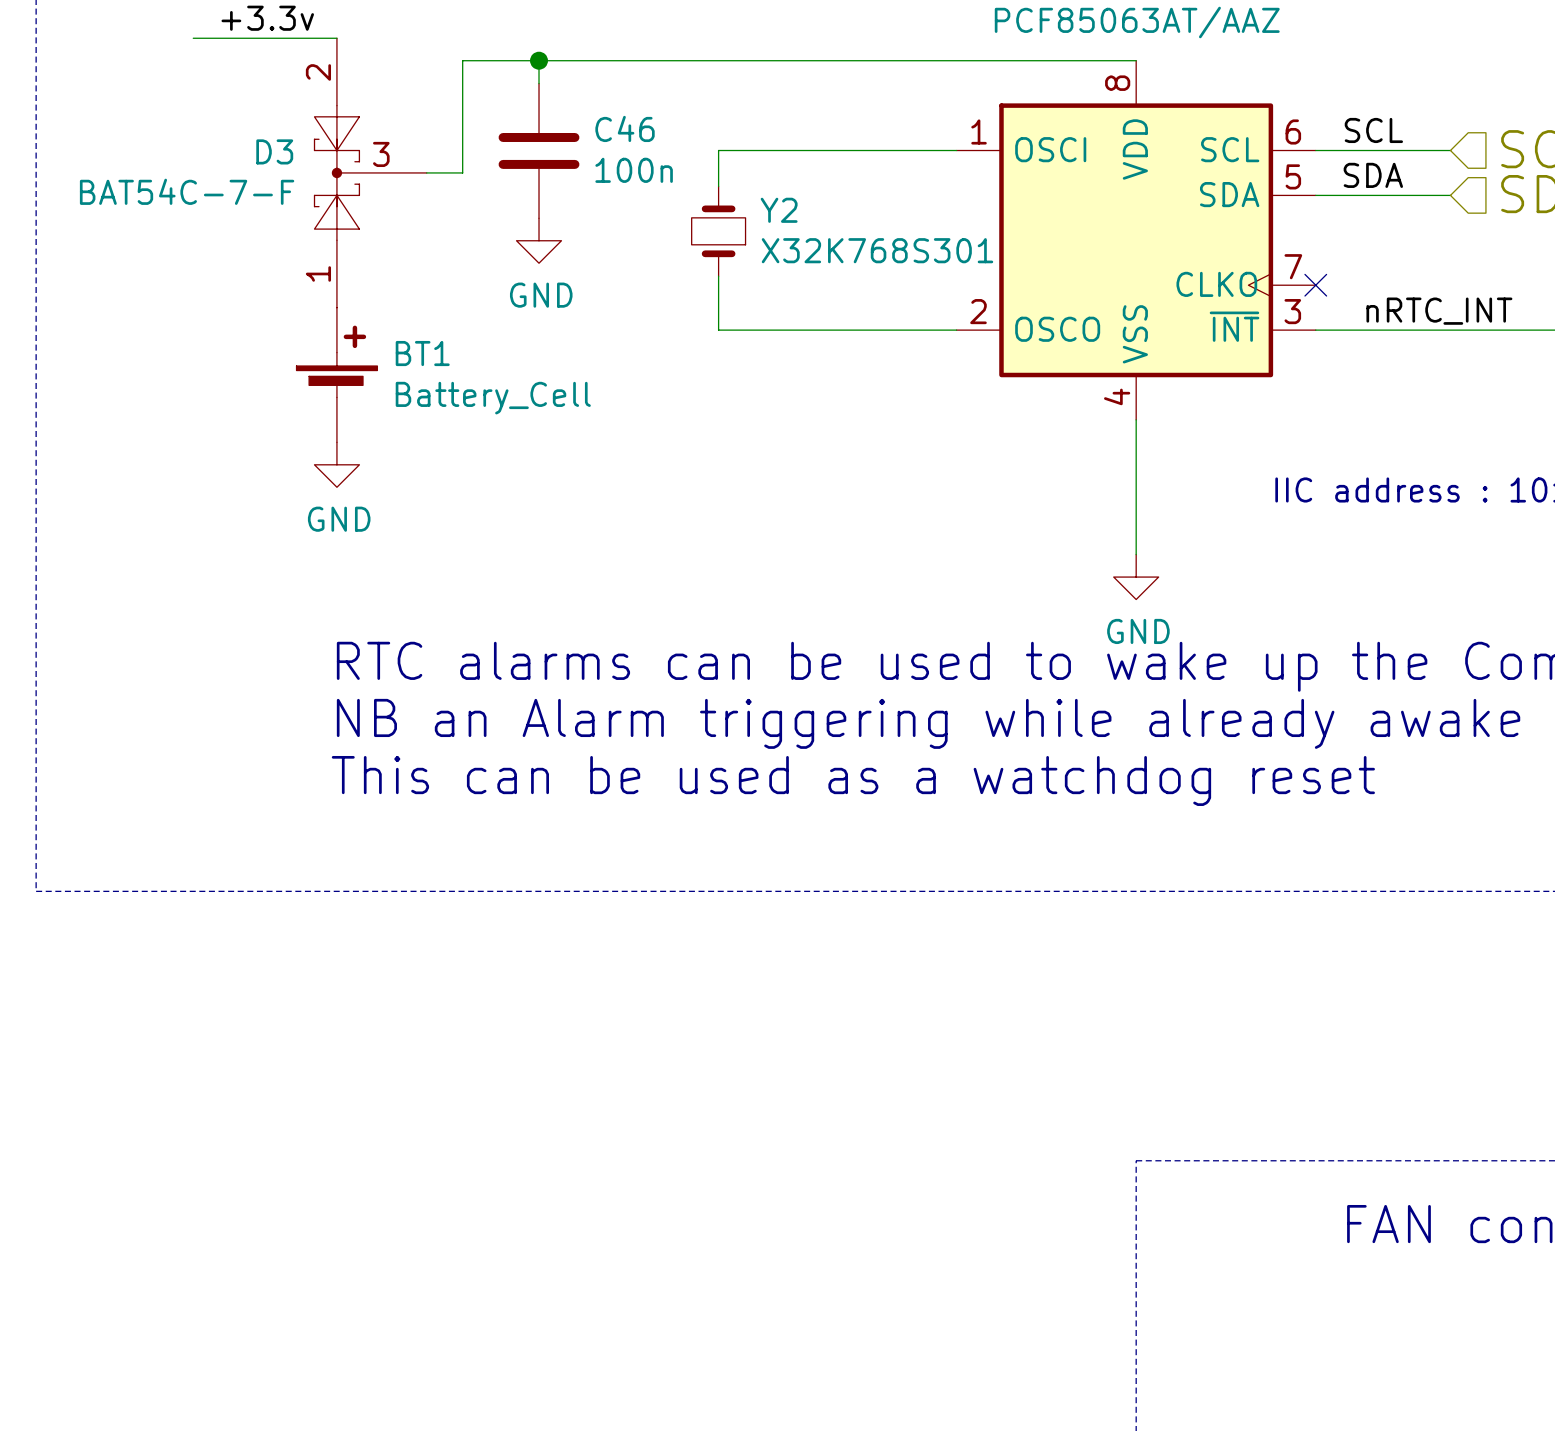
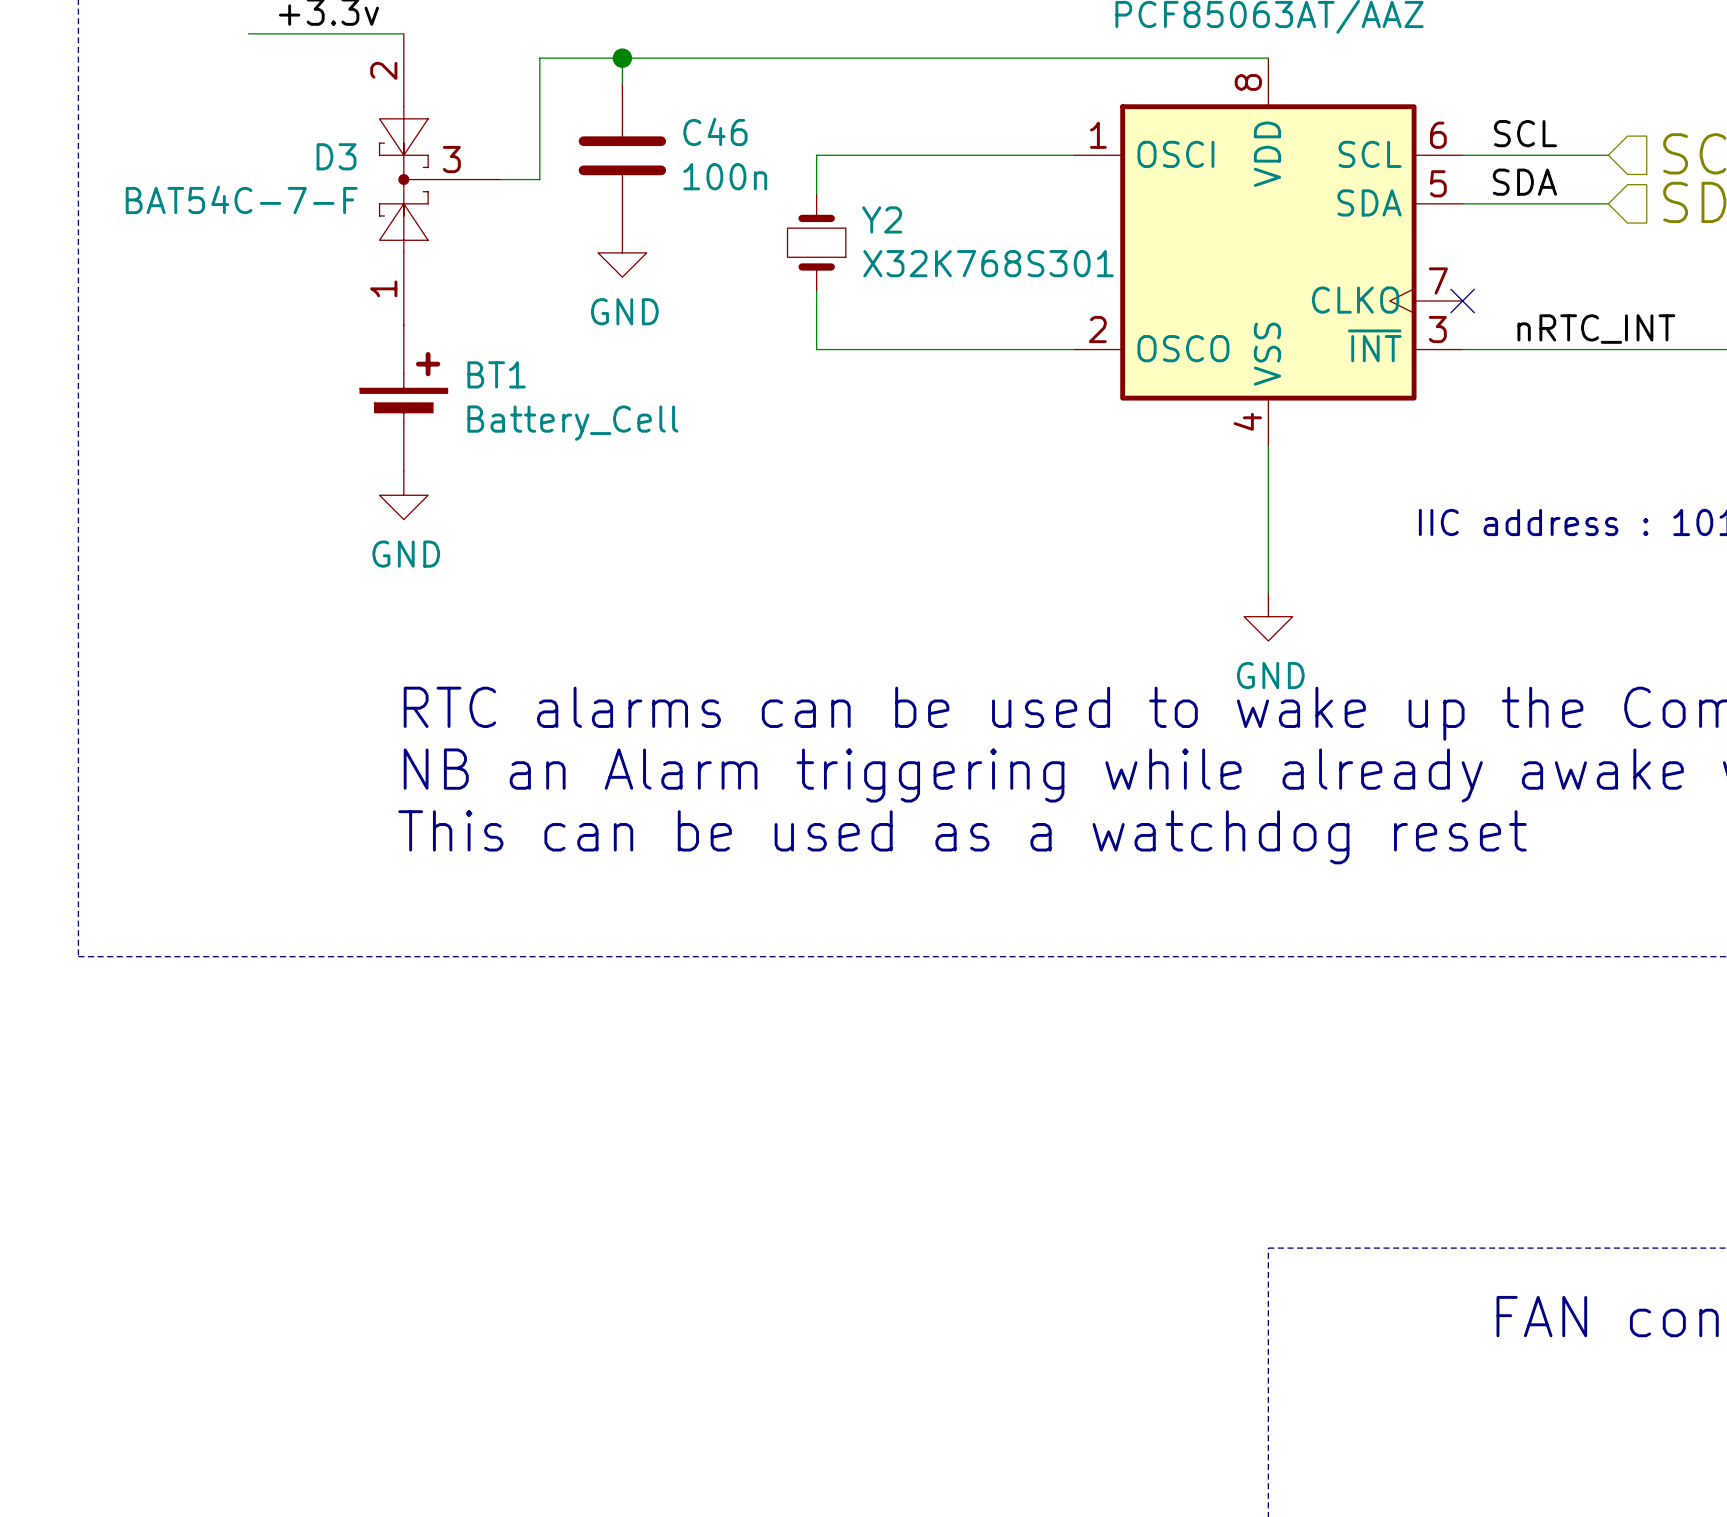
BT1 symbol: [296, 307, 378, 443] -> [360, 325, 448, 471]

